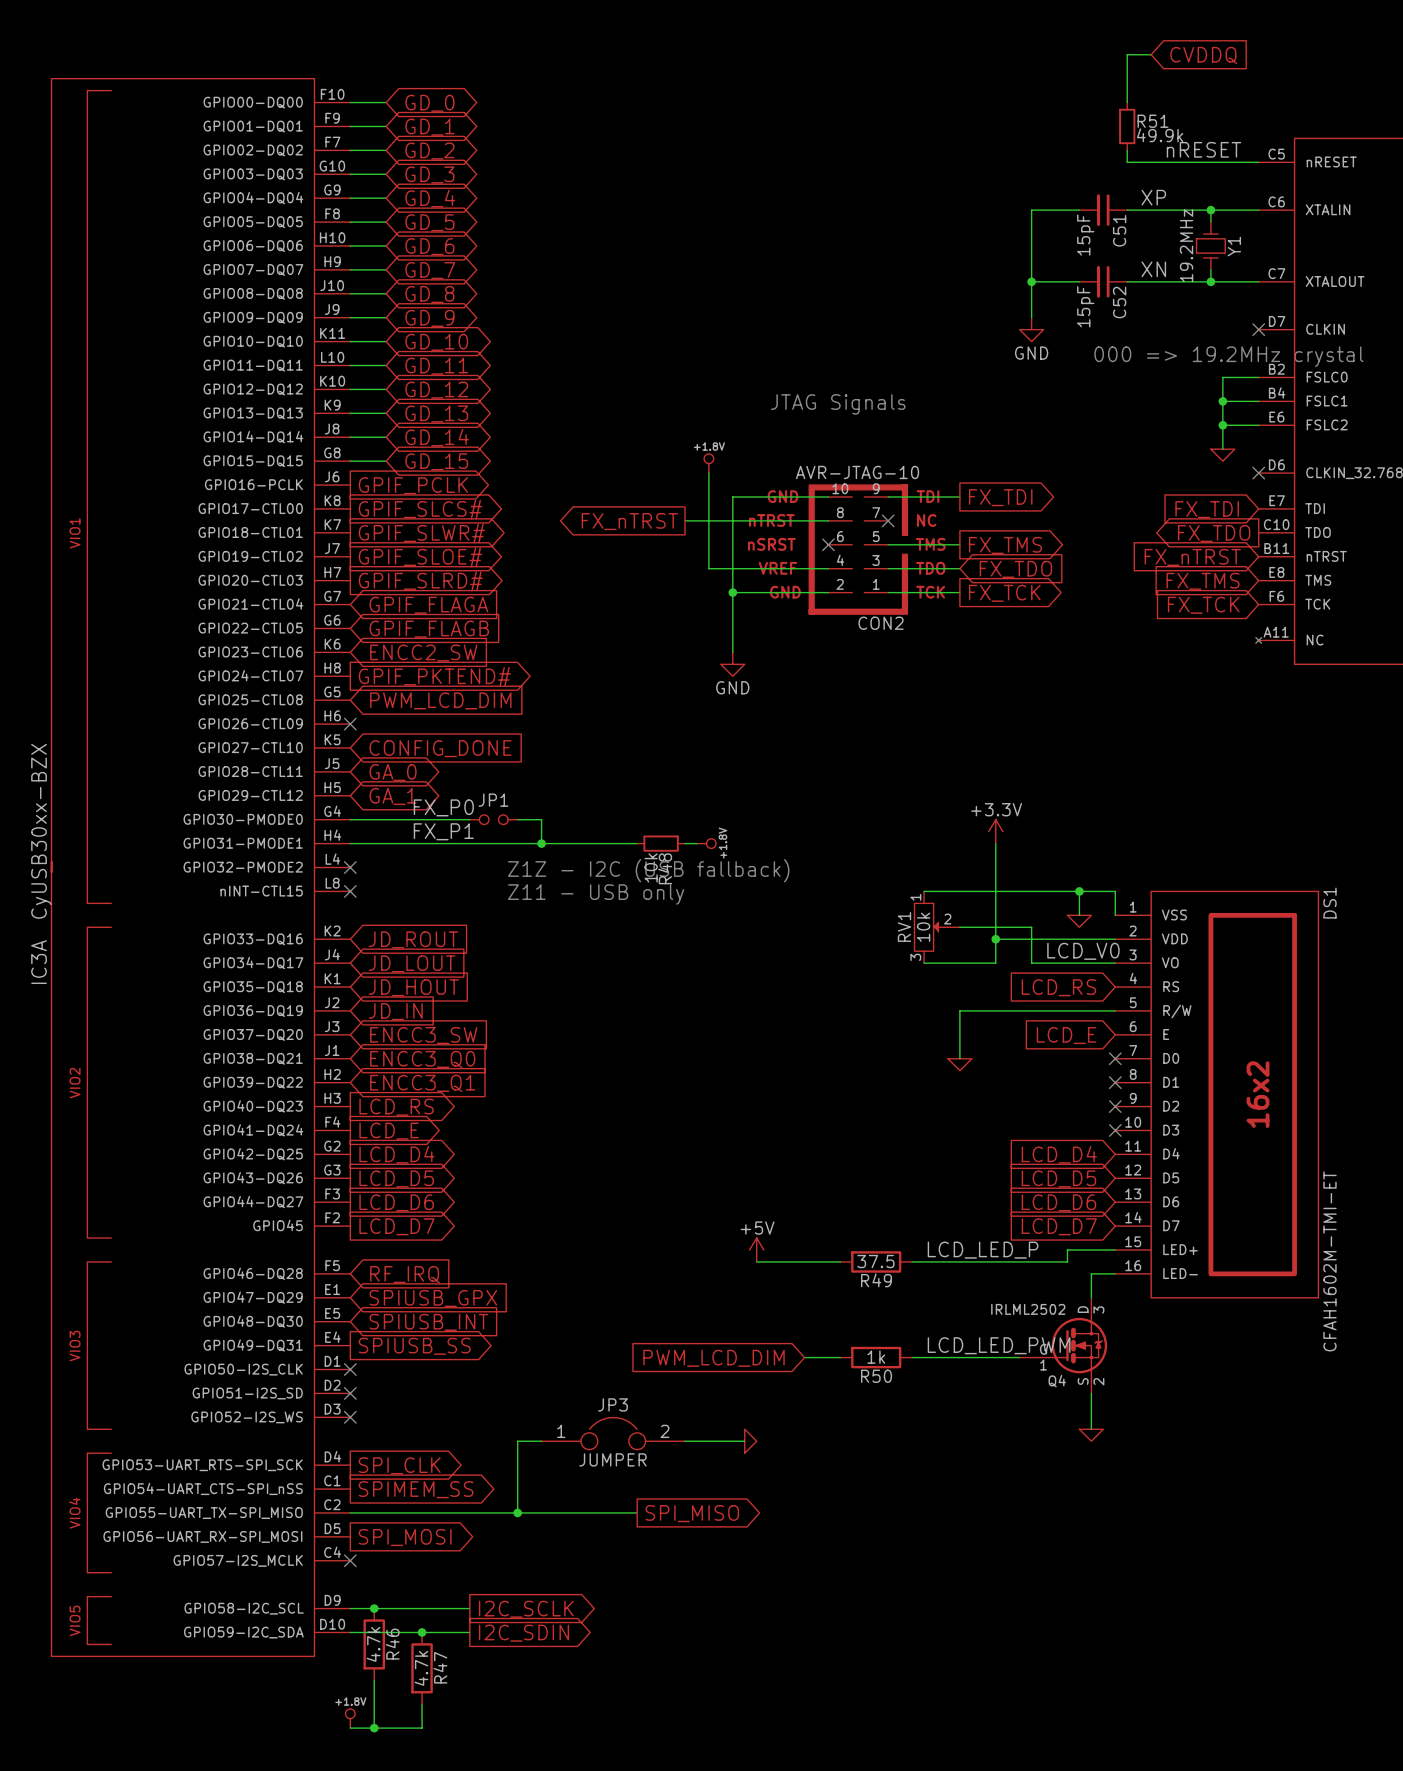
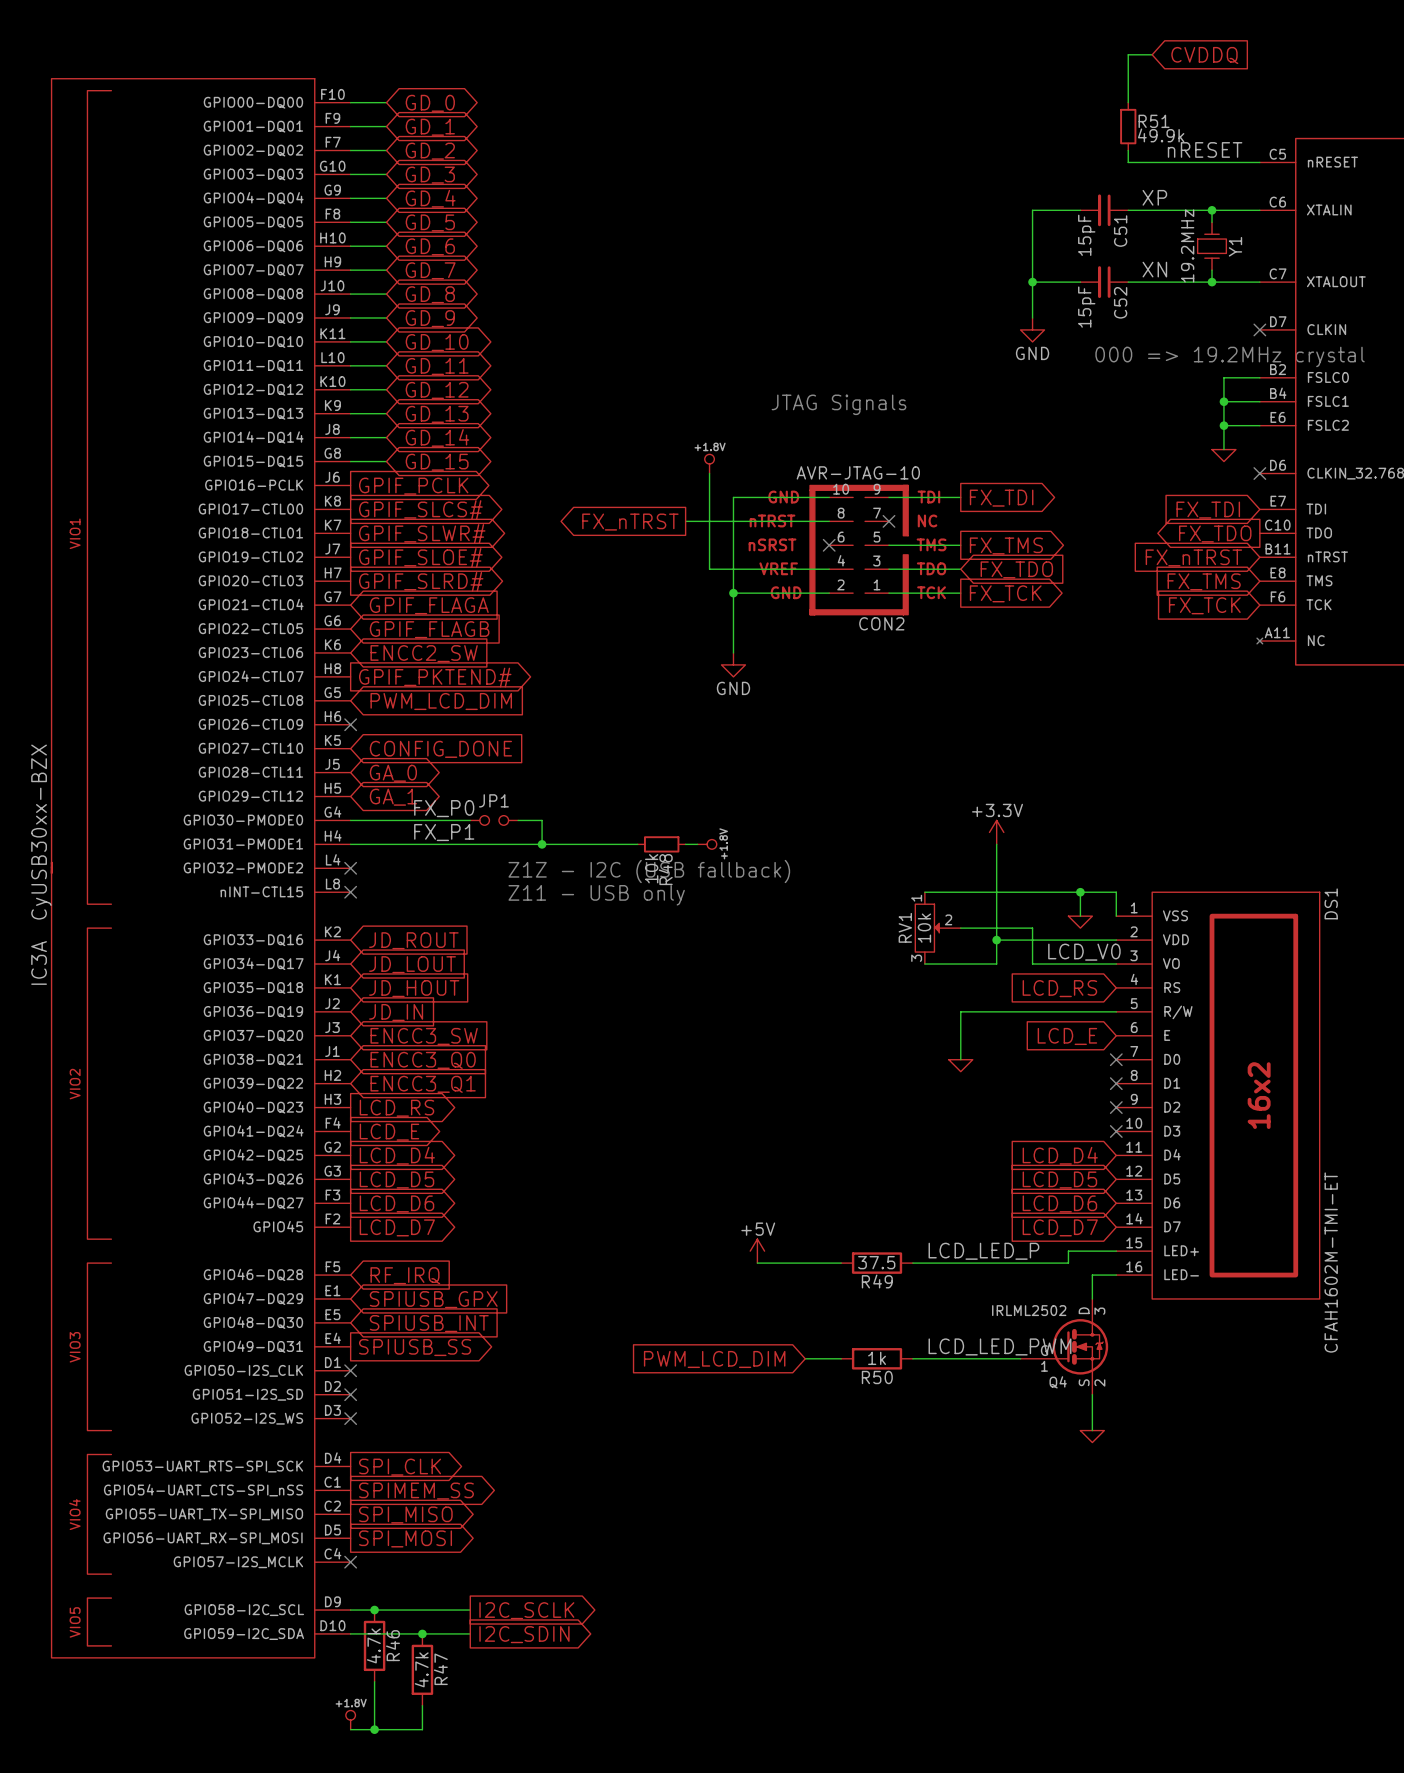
JP3: JUMPER (613, 1433) -> none
wire: (541, 1441) (517, 1441) (517, 1512) -> none
wire: (685, 1441) (744, 1441) -> none
power symbol: (750, 1441) -> none
wire: (350, 1512) (637, 1512) -> none
junction: (517, 1512) -> none
global label: none -> SPI_MISO (405, 1515)
global label: SPI_MISO (692, 1513) -> none

